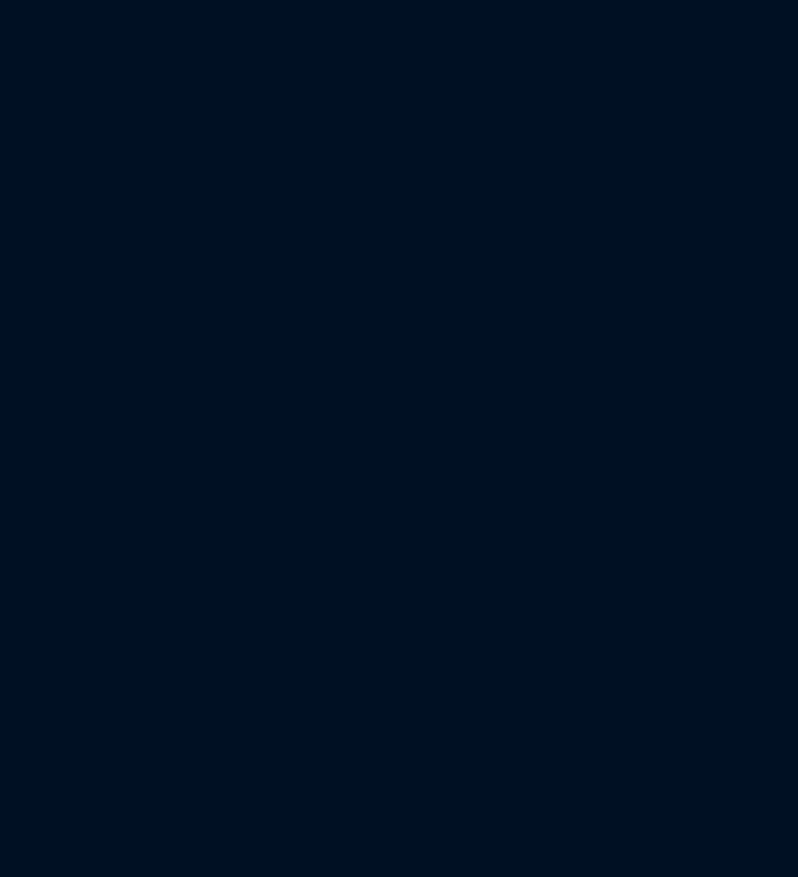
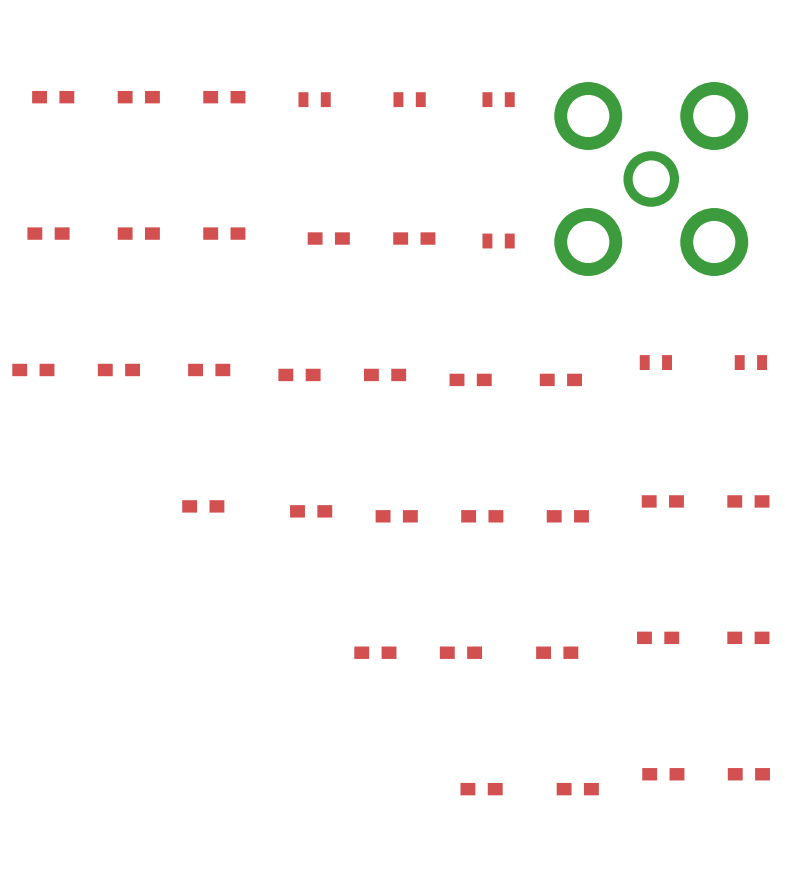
part: none -> (53, 97)
part: none -> (138, 97)
part: none -> (224, 97)
part: none -> (314, 99)
part: none -> (409, 99)
part: none -> (498, 99)
part: none -> (651, 179)
part: none -> (48, 233)
part: none -> (138, 233)
part: none -> (224, 233)
part: none -> (328, 238)
part: none -> (414, 238)
part: none -> (498, 241)
part: none -> (655, 362)
part: none -> (750, 362)
part: none -> (33, 369)
part: none -> (118, 369)
part: none -> (209, 369)
part: none -> (299, 374)
part: none -> (385, 374)
part: none -> (470, 379)
part: none -> (560, 379)
part: none -> (662, 501)
part: none -> (748, 501)
part: none -> (203, 506)
part: none -> (311, 511)
part: none -> (396, 516)
part: none -> (482, 516)
part: none -> (567, 516)
part: none -> (658, 637)
part: none -> (748, 637)
part: none -> (375, 652)
part: none -> (460, 652)
part: none -> (557, 652)
part: none -> (663, 774)
part: none -> (748, 774)
part: none -> (481, 789)
part: none -> (577, 789)

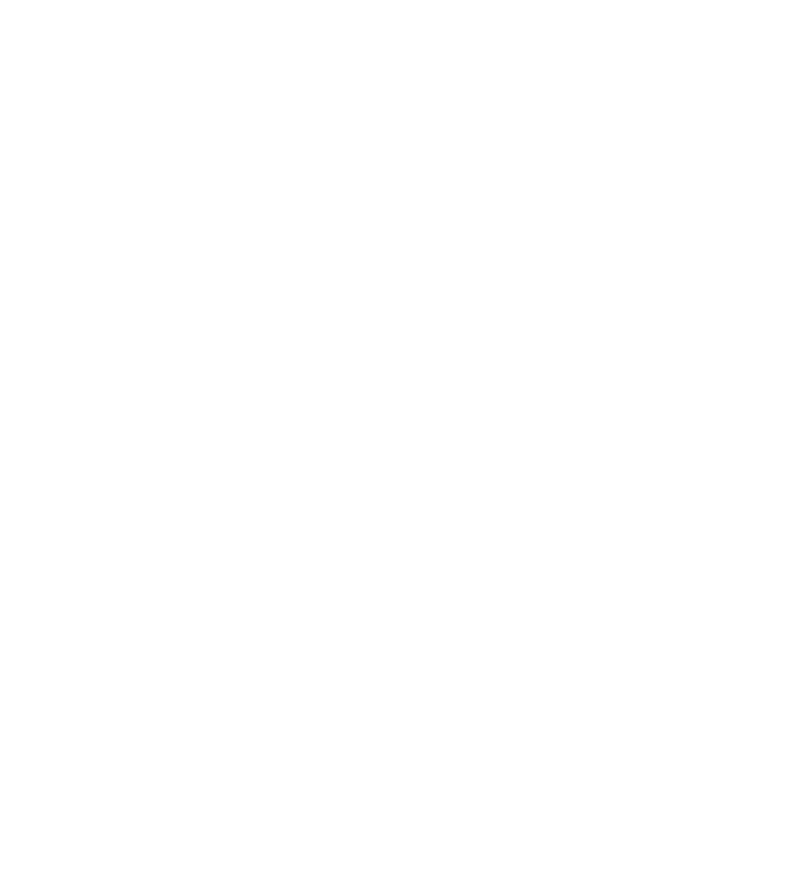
part: (53, 97) -> none
part: (138, 97) -> none
part: (224, 97) -> none
part: (314, 99) -> none
part: (409, 99) -> none
part: (498, 99) -> none
part: (651, 179) -> none
part: (48, 233) -> none
part: (138, 233) -> none
part: (224, 233) -> none
part: (328, 238) -> none
part: (414, 238) -> none
part: (498, 241) -> none
part: (655, 362) -> none
part: (750, 362) -> none
part: (33, 369) -> none
part: (118, 369) -> none
part: (209, 369) -> none
part: (299, 374) -> none
part: (385, 374) -> none
part: (470, 379) -> none
part: (560, 379) -> none
part: (662, 501) -> none
part: (748, 501) -> none
part: (203, 506) -> none
part: (311, 511) -> none
part: (396, 516) -> none
part: (482, 516) -> none
part: (567, 516) -> none
part: (658, 637) -> none
part: (748, 637) -> none
part: (375, 652) -> none
part: (460, 652) -> none
part: (557, 652) -> none
part: (663, 774) -> none
part: (748, 774) -> none
part: (481, 789) -> none
part: (577, 789) -> none

